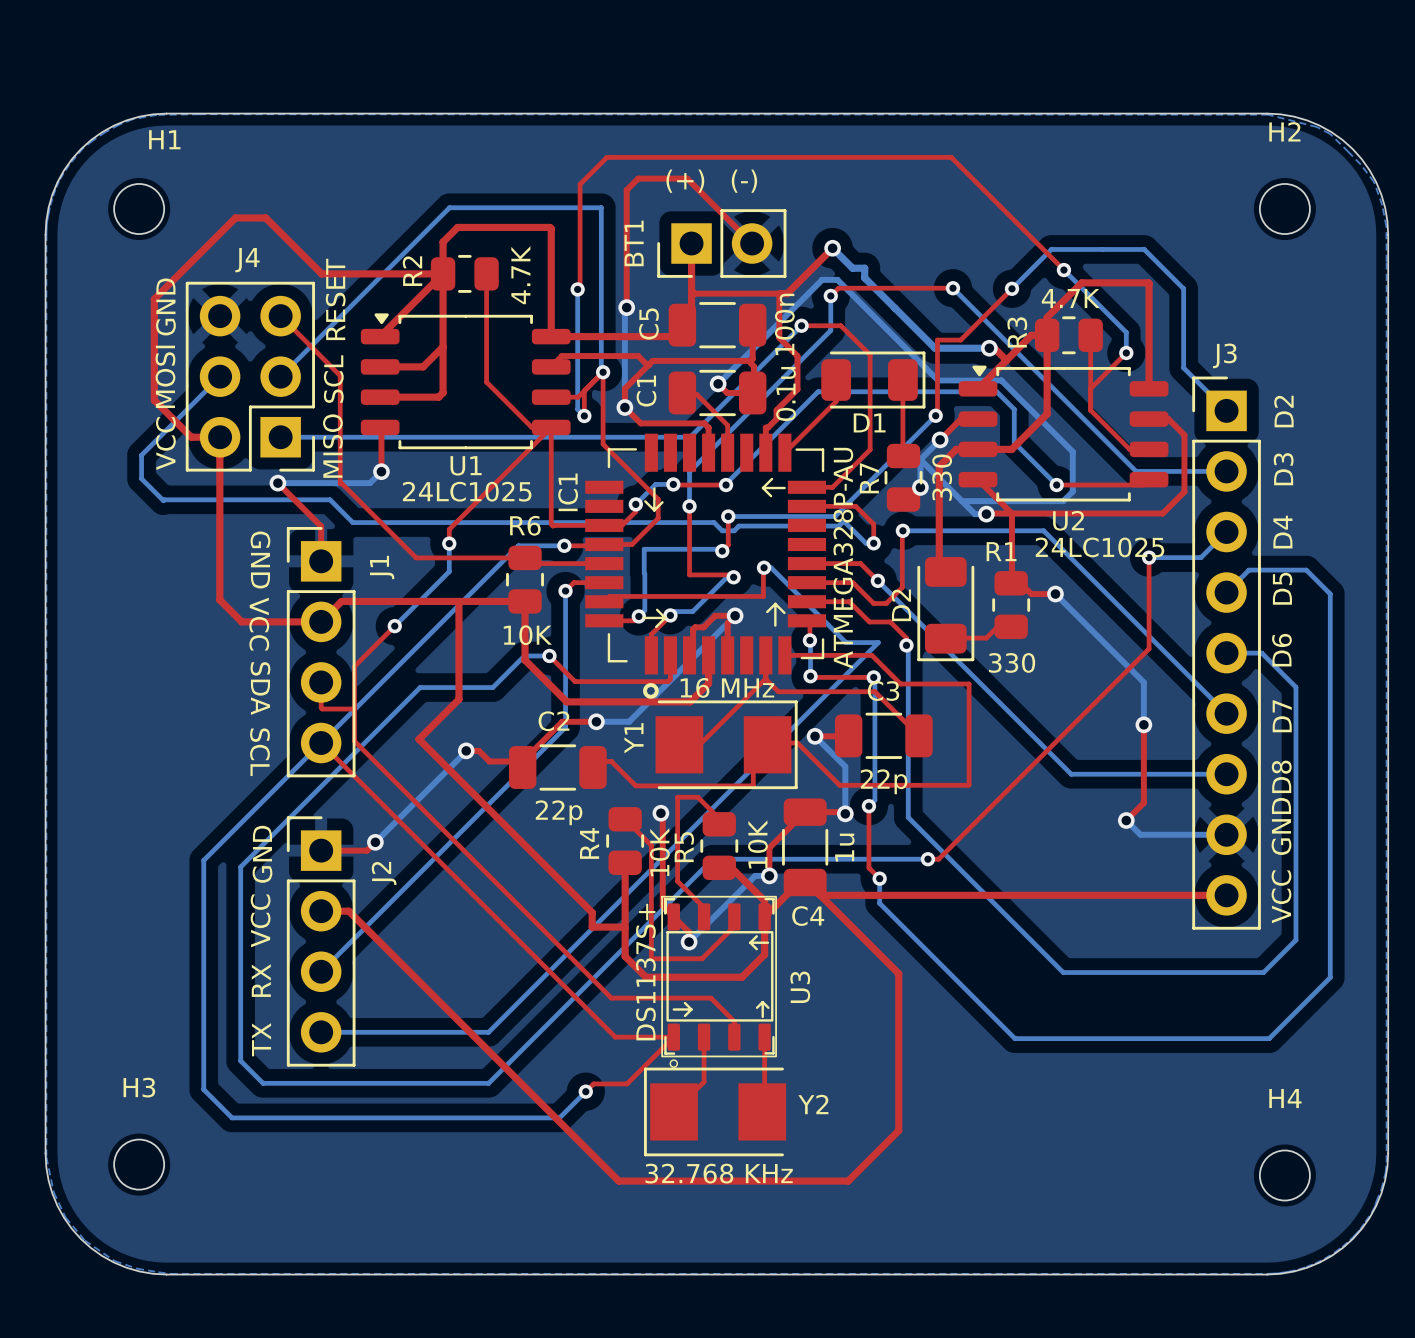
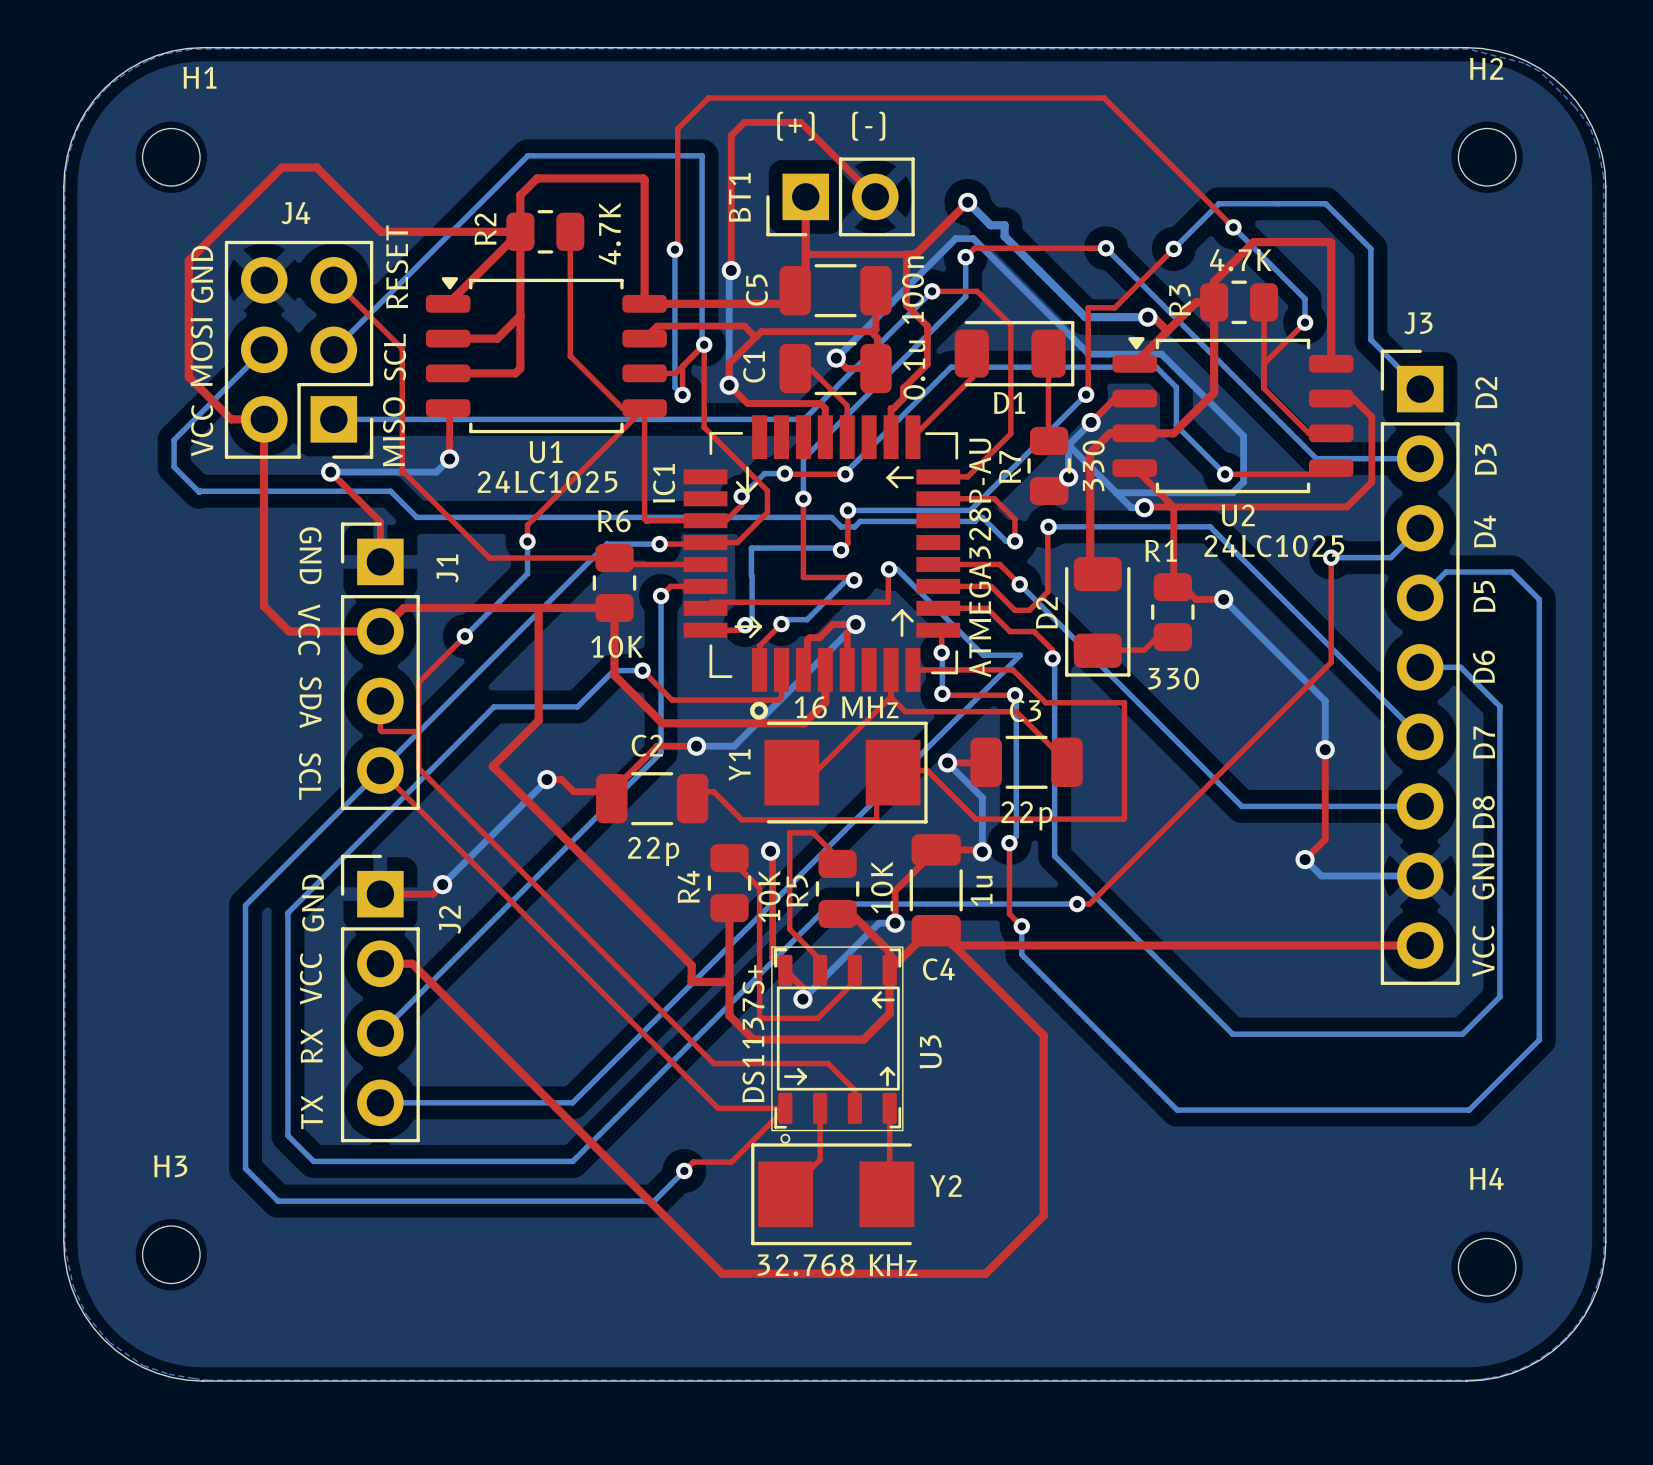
IC1 footprint: [585, 433, 827, 699] -> [683, 415, 961, 720]

